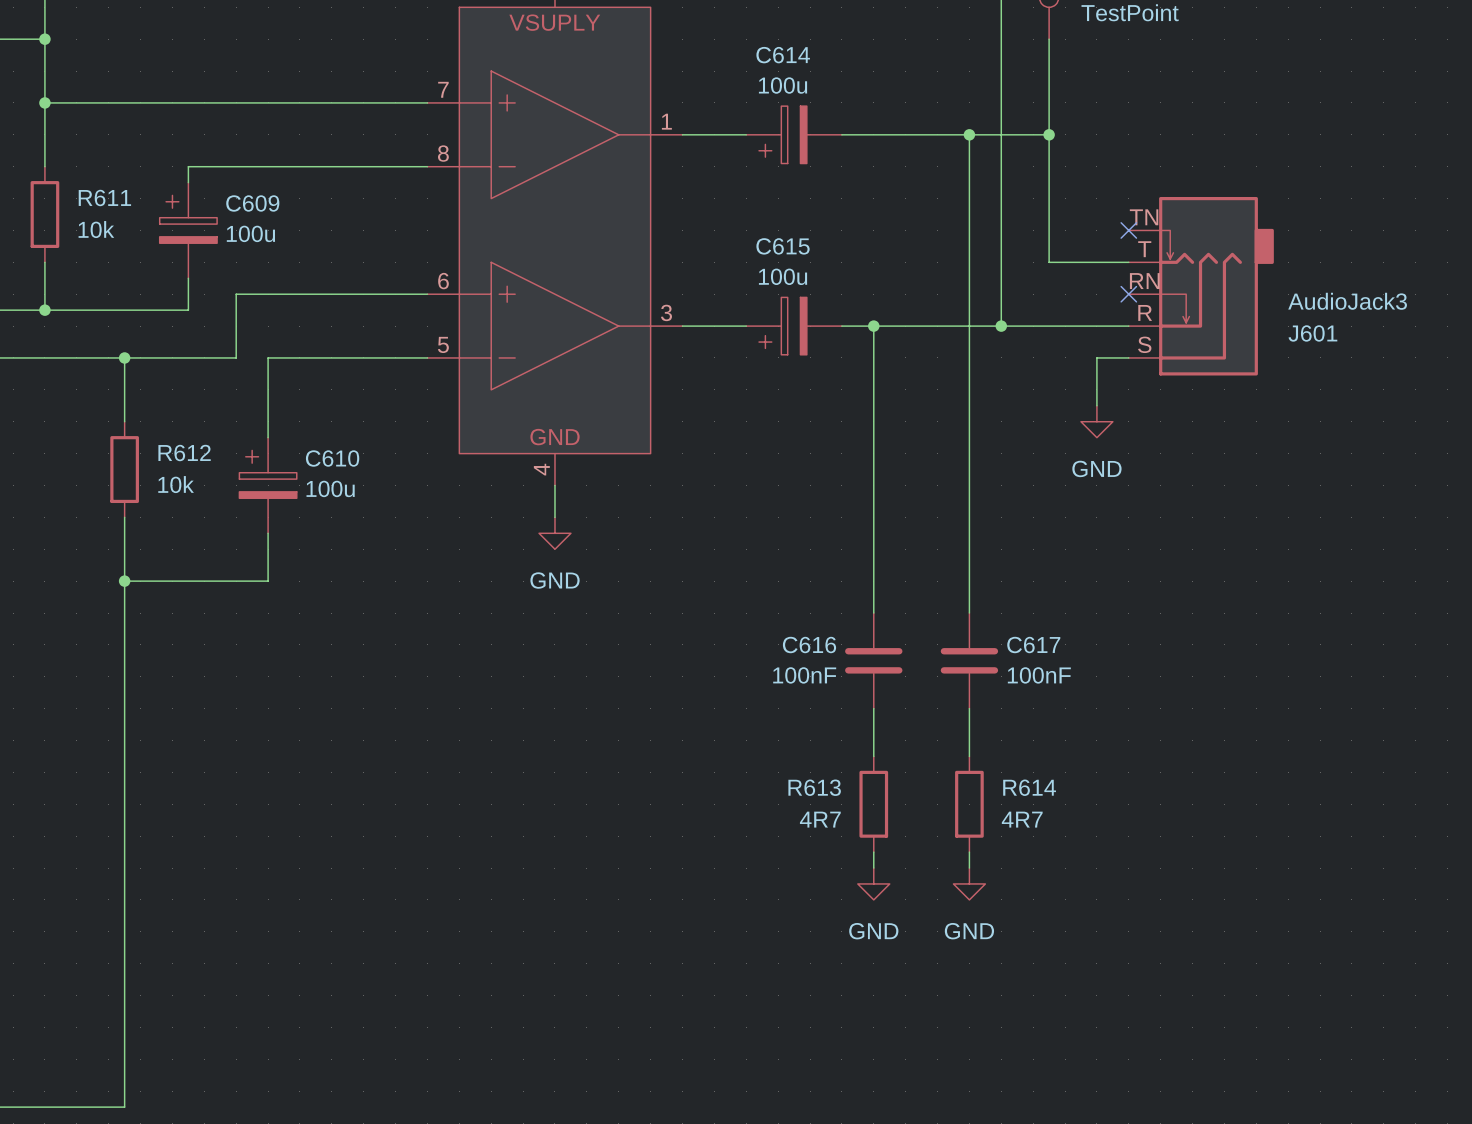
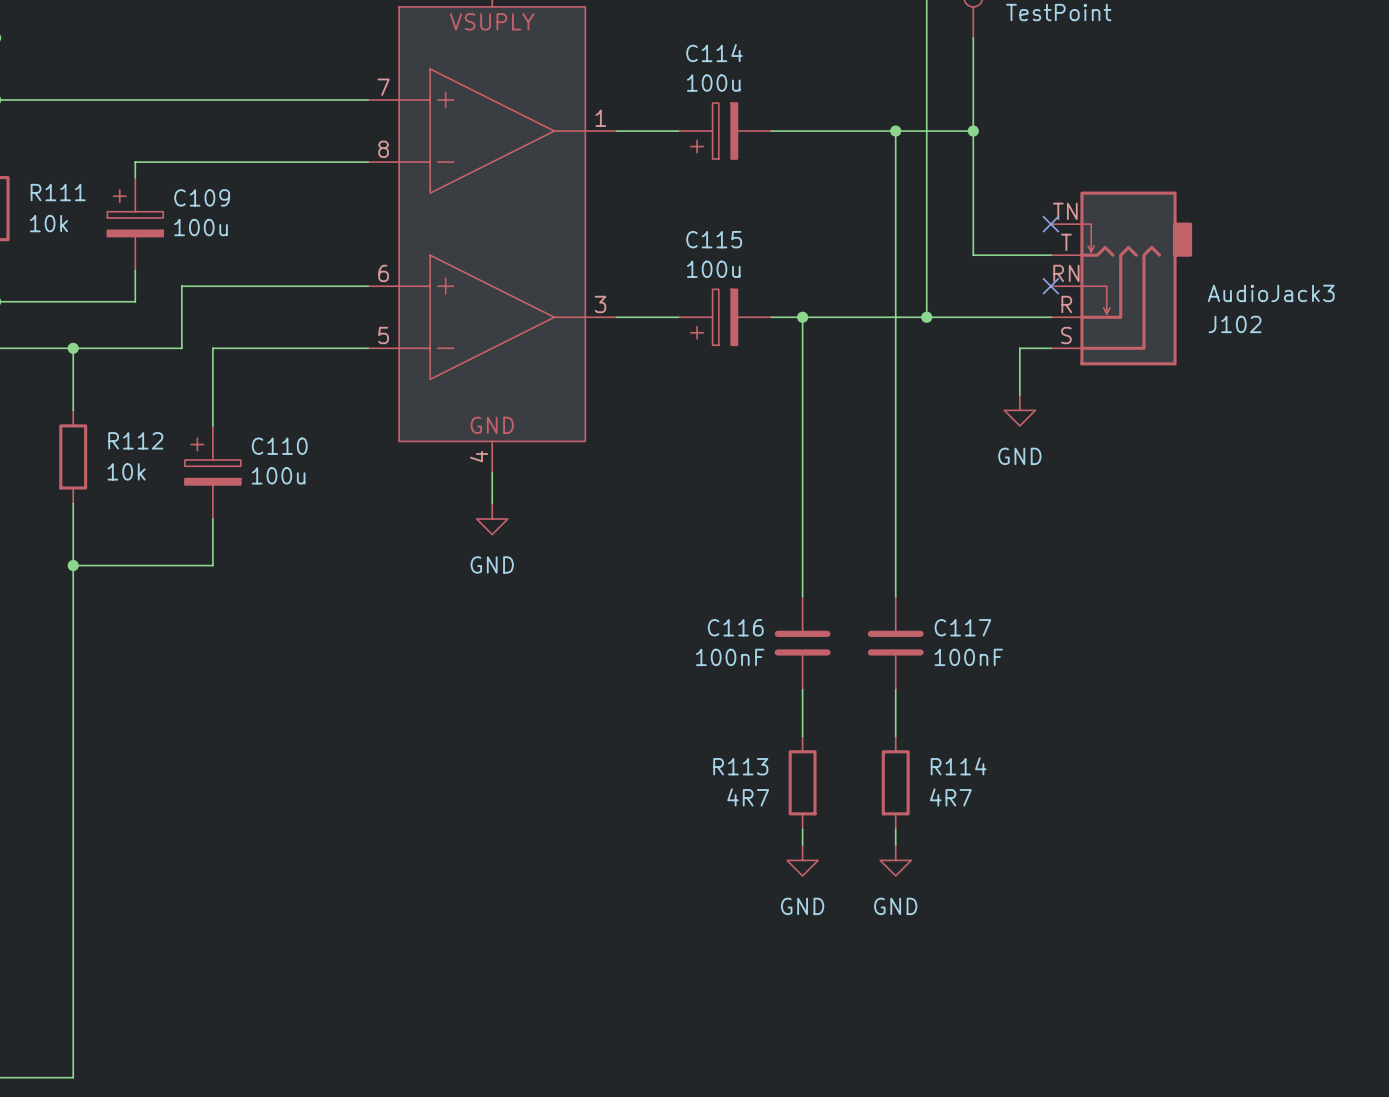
C614 name: C614 (783, 55) -> C114 (714, 53)
R611 name: R611 (104, 197) -> R111 (58, 192)
C609 name: C609 (252, 203) -> C109 (202, 197)
C615 name: C615 (783, 246) -> C115 (714, 239)
J601 name: J601 (1312, 333) -> J102 (1235, 324)
R612 name: R612 (184, 453) -> R112 (135, 440)
C610 name: C610 (332, 458) -> C110 (279, 446)
C616 name: C616 (809, 645) -> C116 (735, 627)
C617 name: C617 (1033, 645) -> C117 (962, 627)
R613 name: R613 (814, 787) -> R113 (740, 766)
R614 name: R614 (1029, 787) -> R114 (958, 766)

